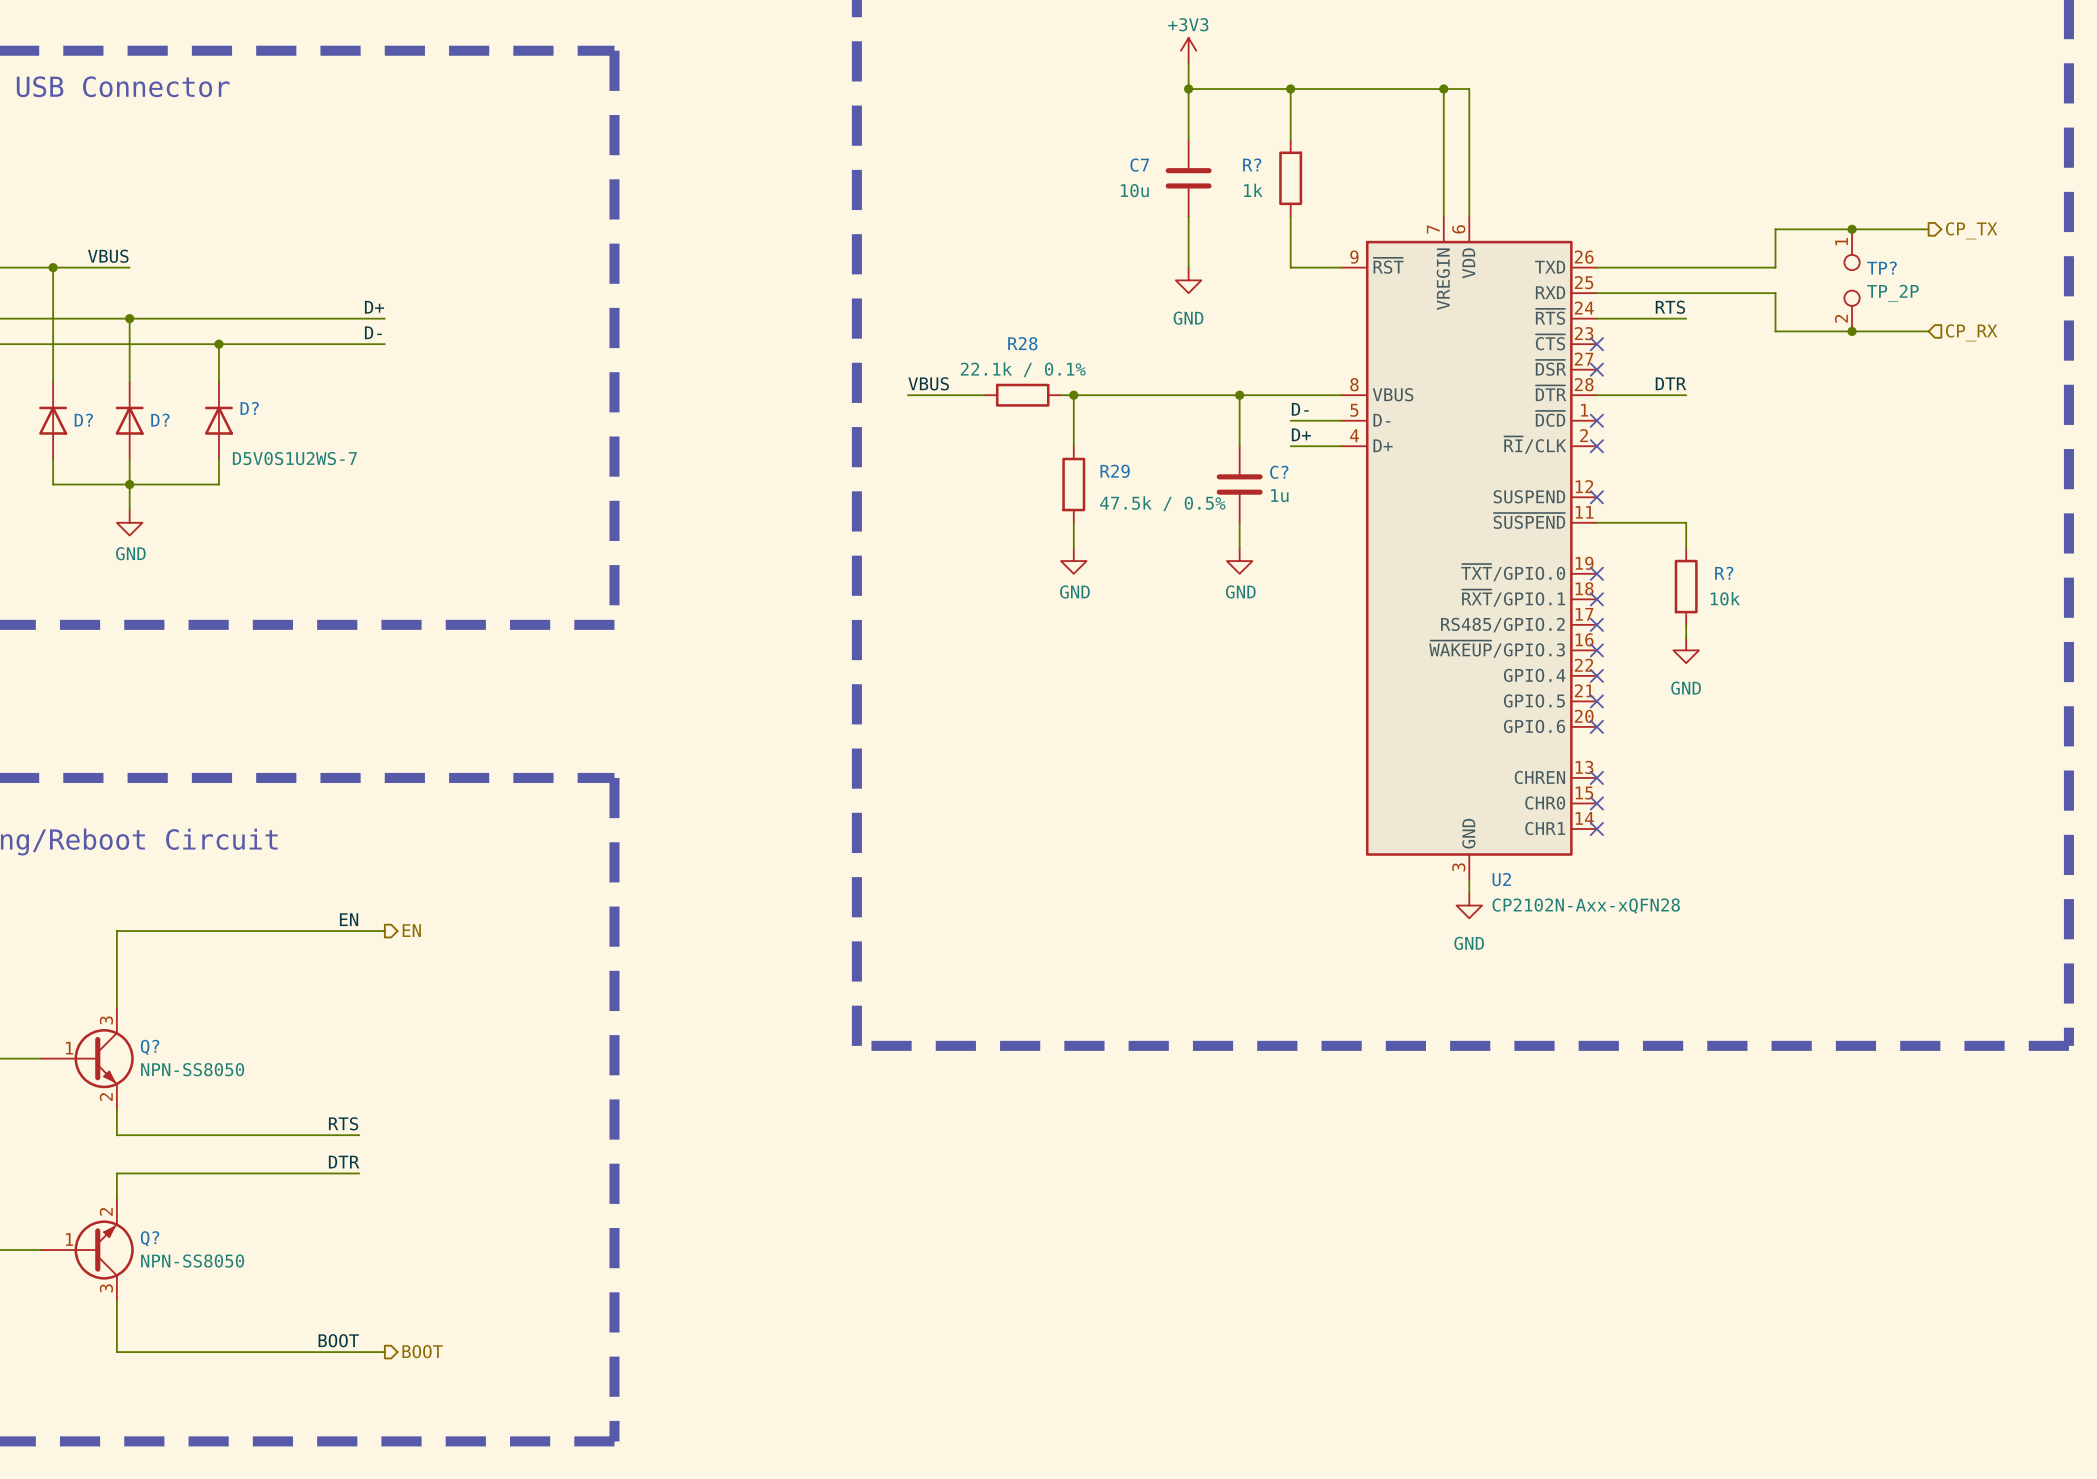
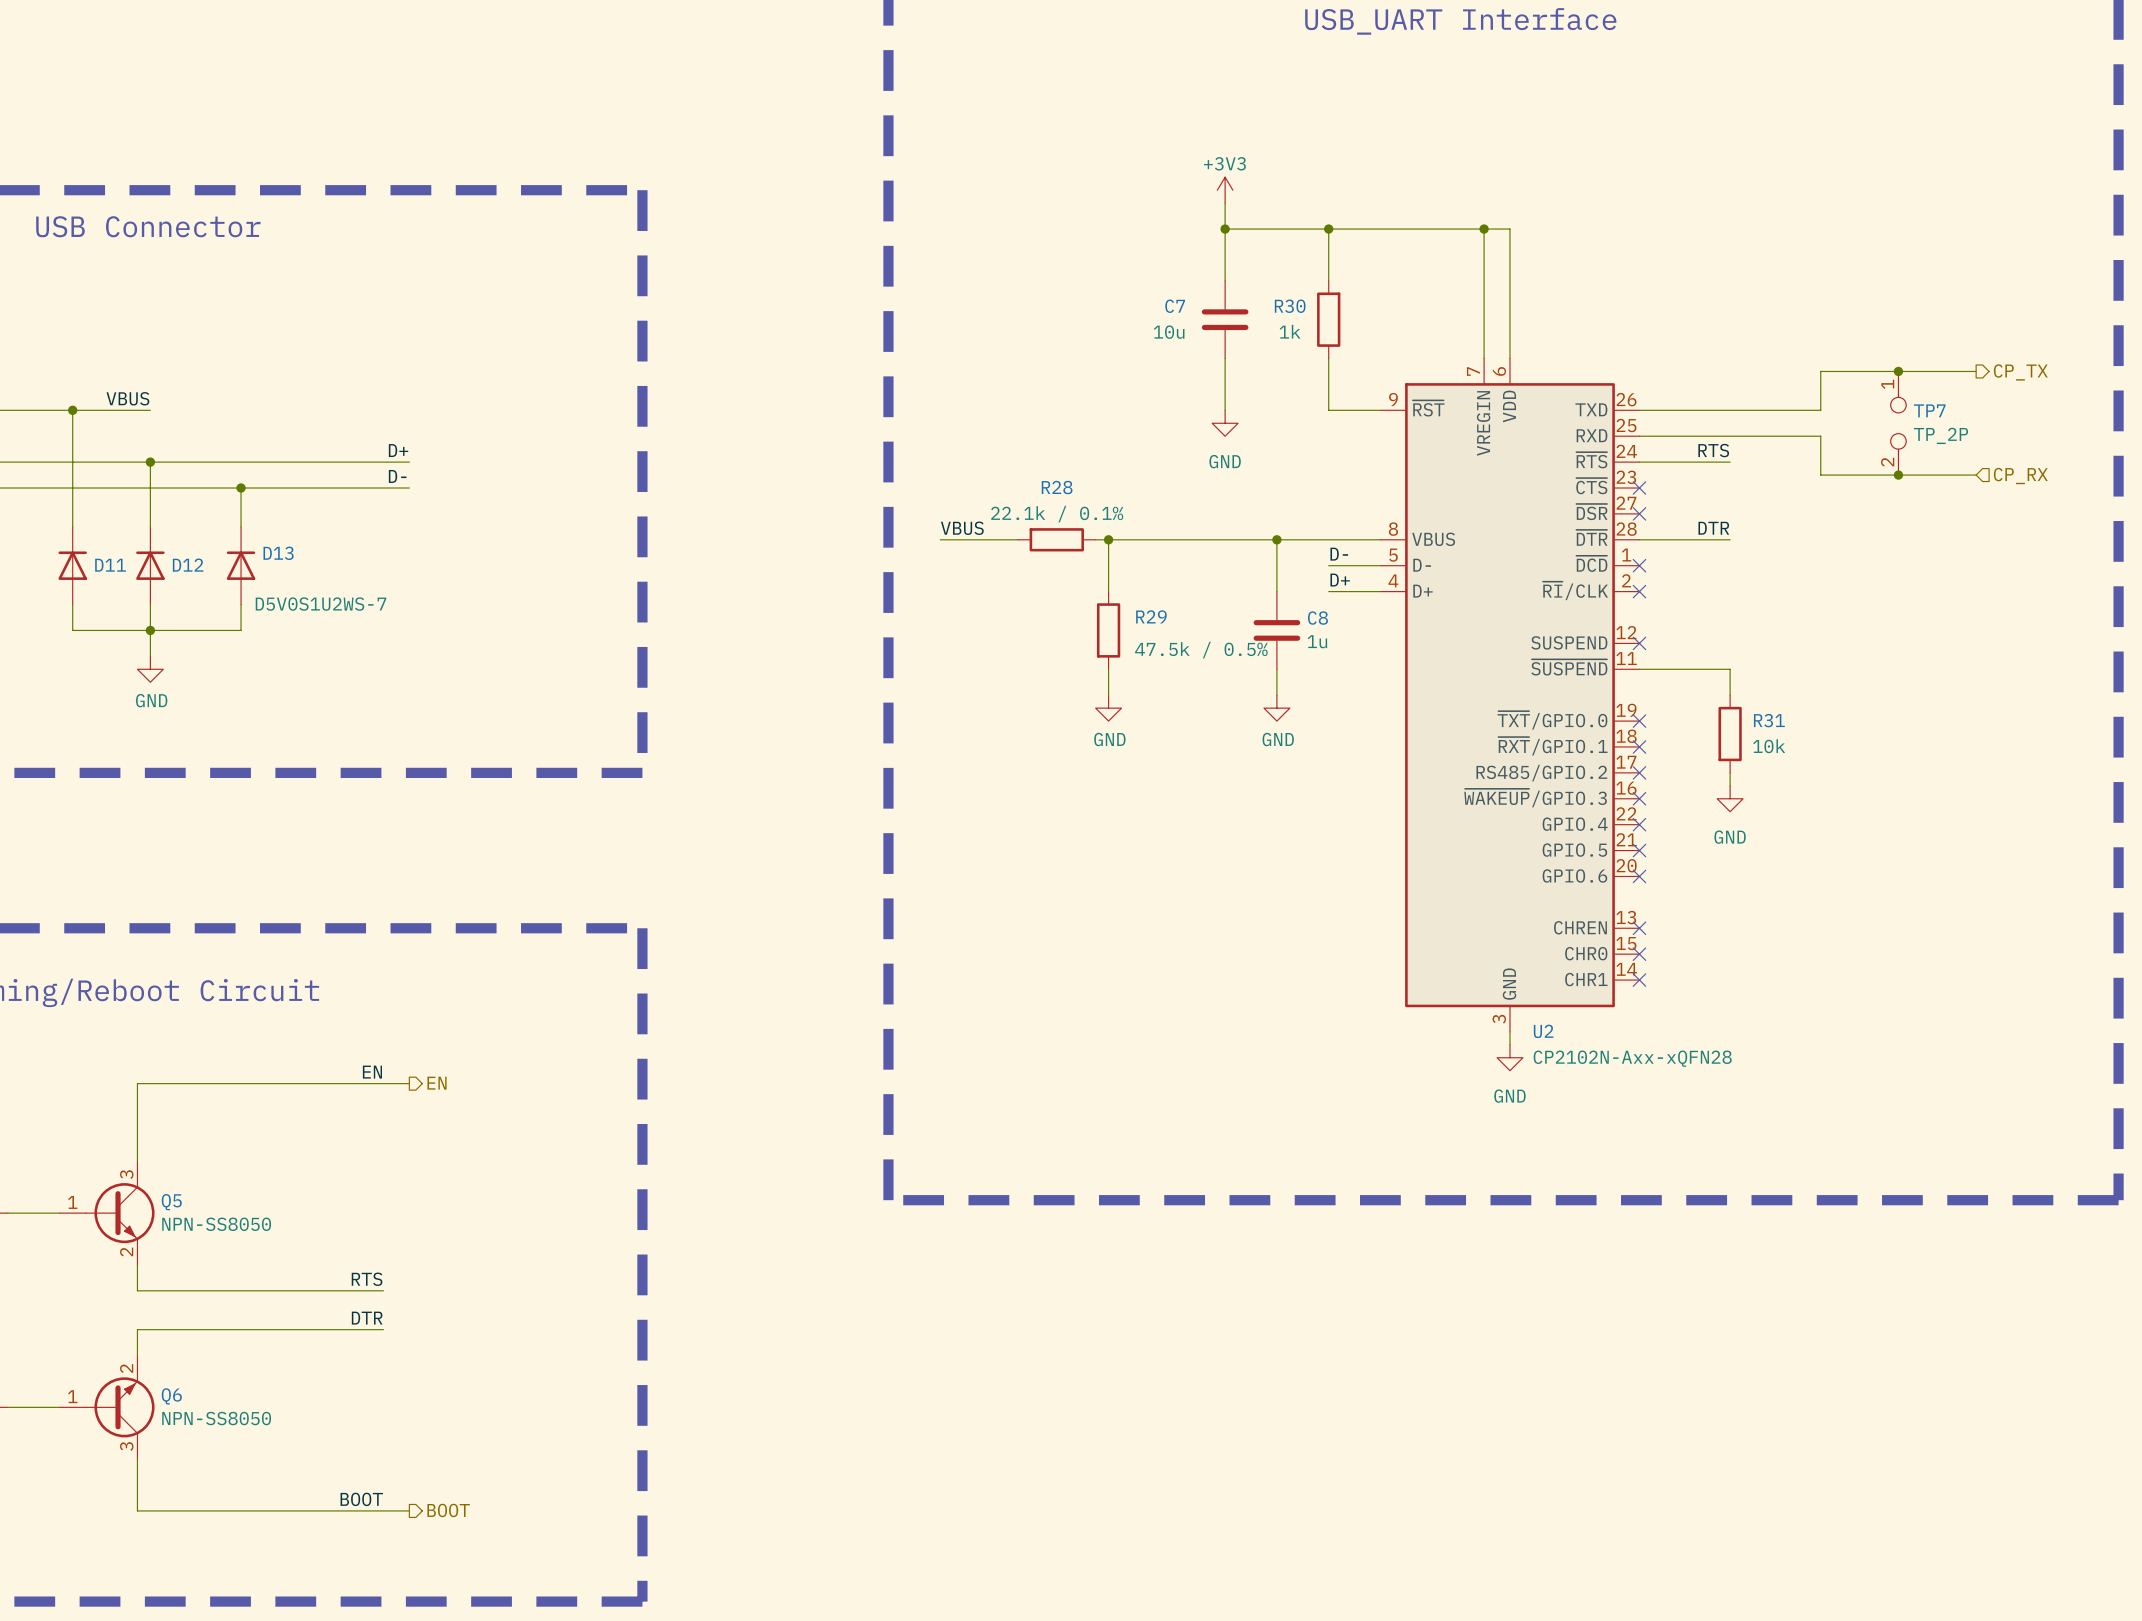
R? name: R? (1252, 164) -> R30 (1290, 306)
TP? name: TP? (1882, 268) -> TP7 (1929, 410)
D? name: D? (249, 408) -> D13 (278, 553)
D? name: D? (83, 420) -> D11 (110, 565)
D? name: D? (160, 420) -> D12 (188, 565)
C? name: C? (1279, 472) -> C8 (1317, 618)
R? name: R? (1724, 573) -> R31 (1769, 720)
Q?: NPN-SS8050 (87, 1058) -> none
Q5: none -> NPN-SS8050 (107, 1213)
Q?: NPN-SS8050 (87, 1250) -> none
Q6: none -> NPN-SS8050 (107, 1407)

